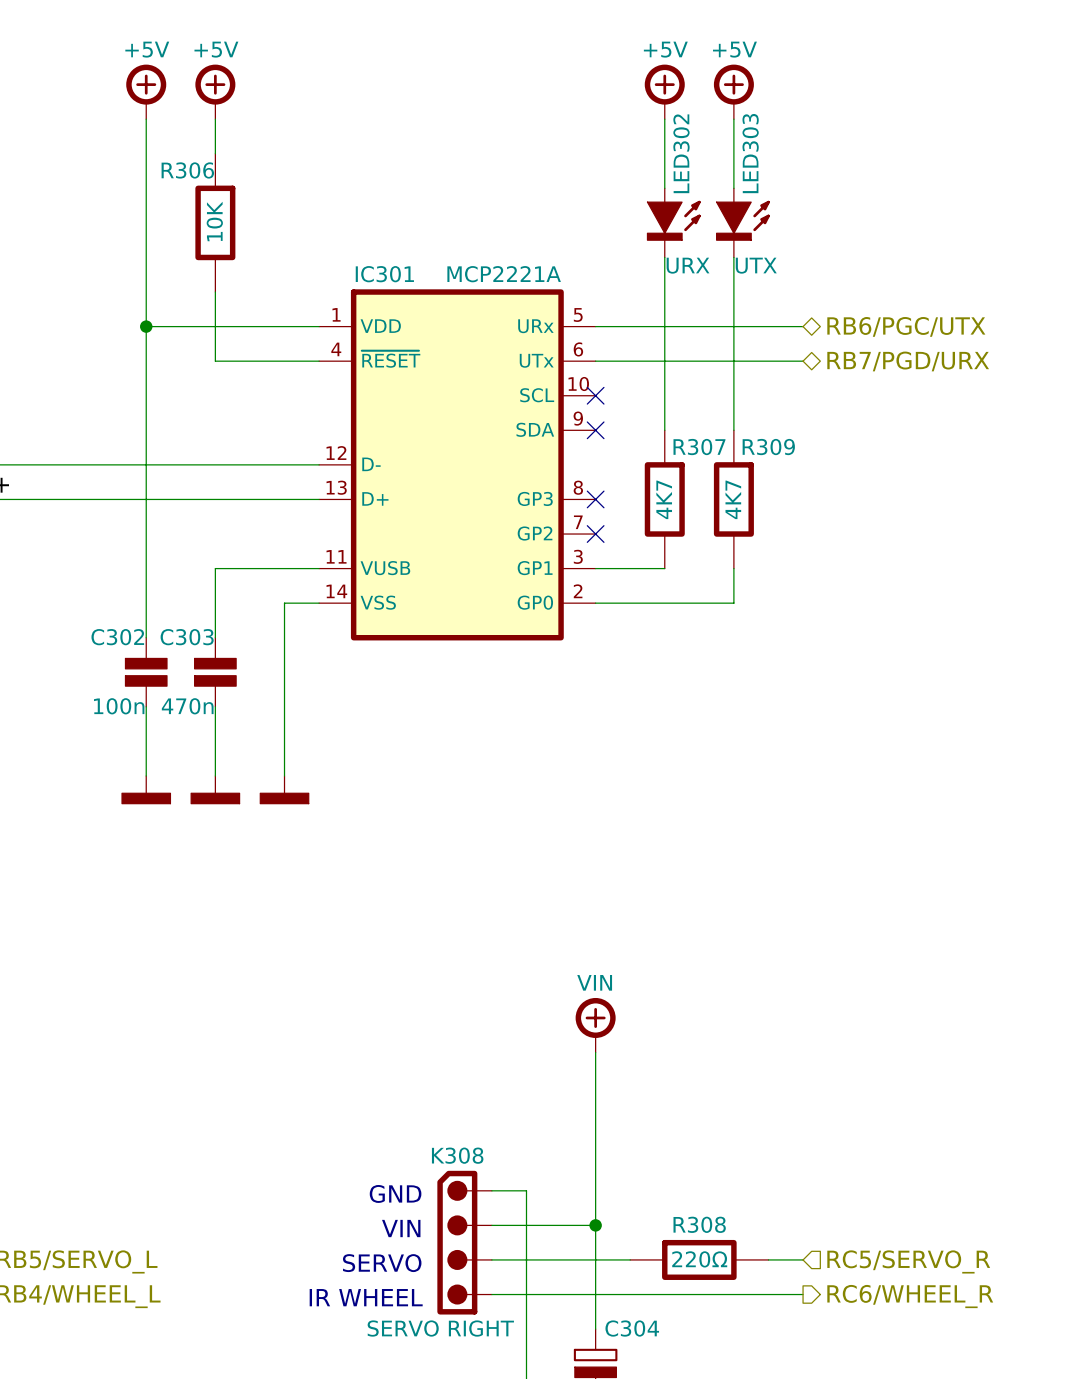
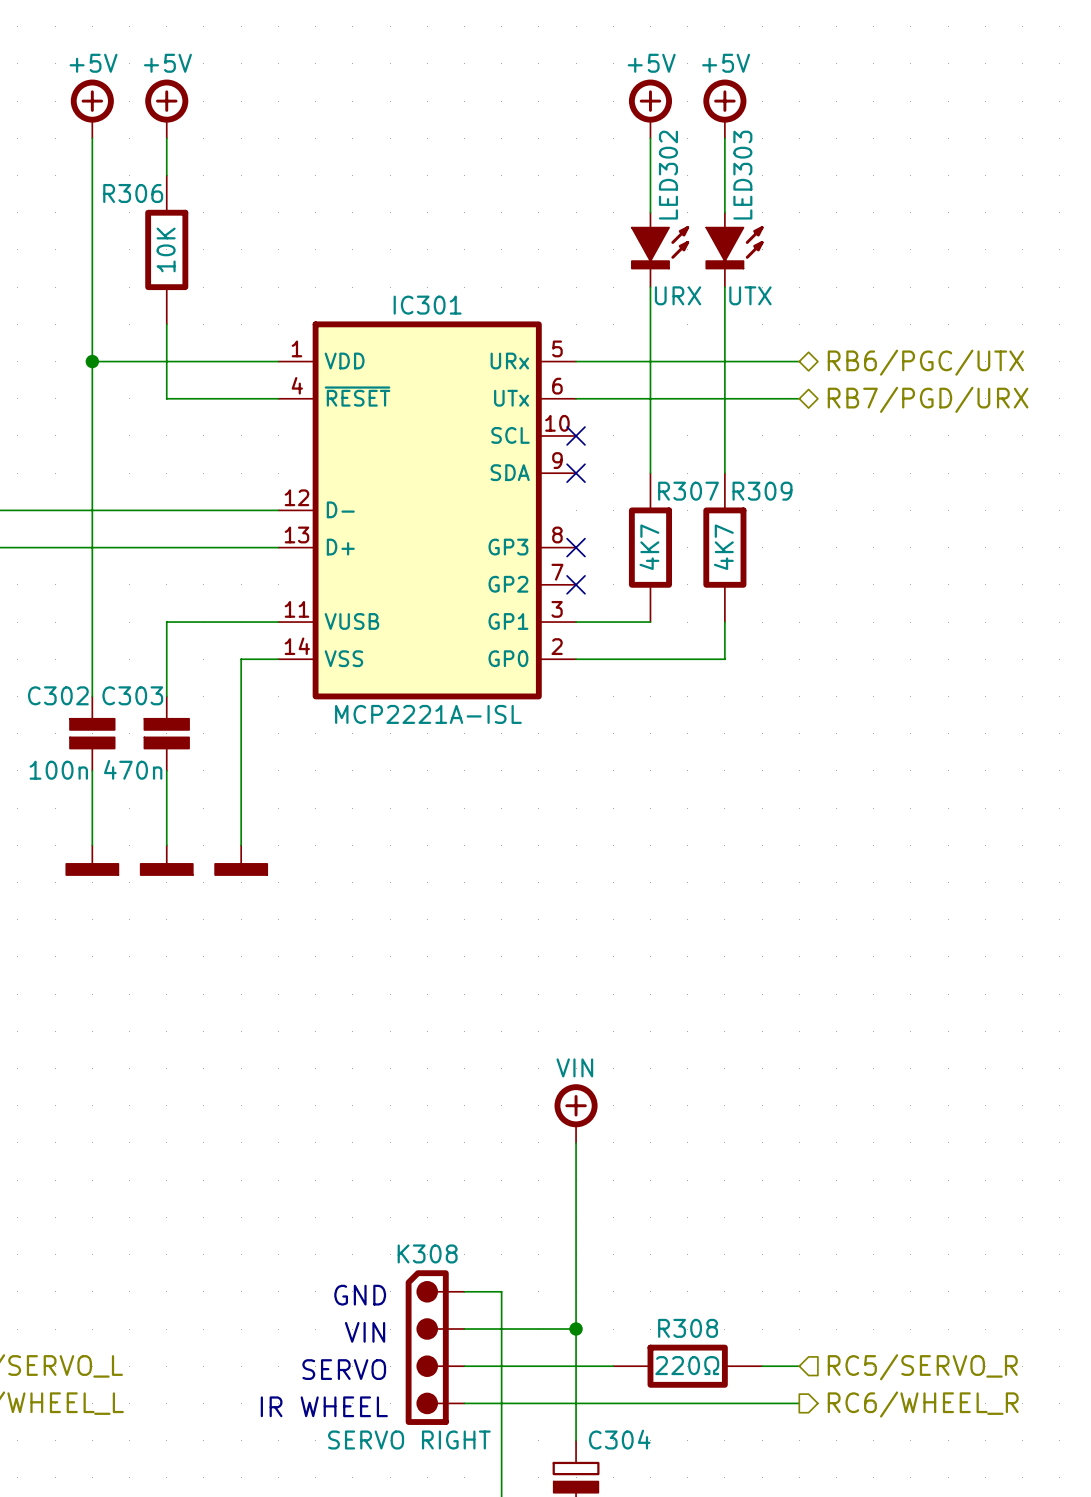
IC301 name position: IC301 (384, 274) -> IC301 (427, 305)
IC301 value: MCP2221A (504, 274) -> none
IC301 text: none -> MCP2221A-ISL (428, 714)

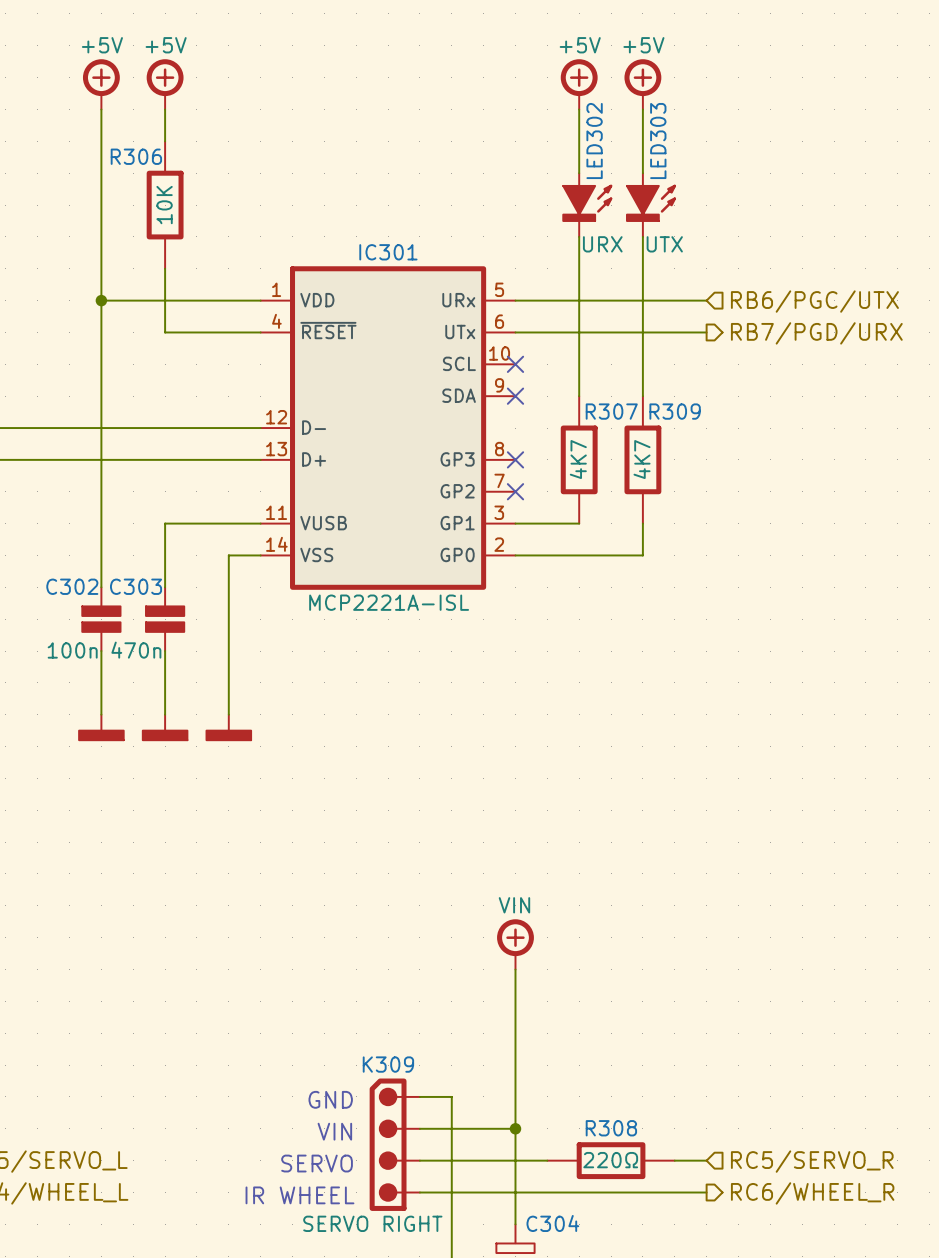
hierarchical label shape: bidirectional (925, 362) -> input (814, 301)
hierarchical label shape: bidirectional (928, 399) -> output (816, 333)
K308 name: K308 (427, 1253) -> K309 (388, 1064)

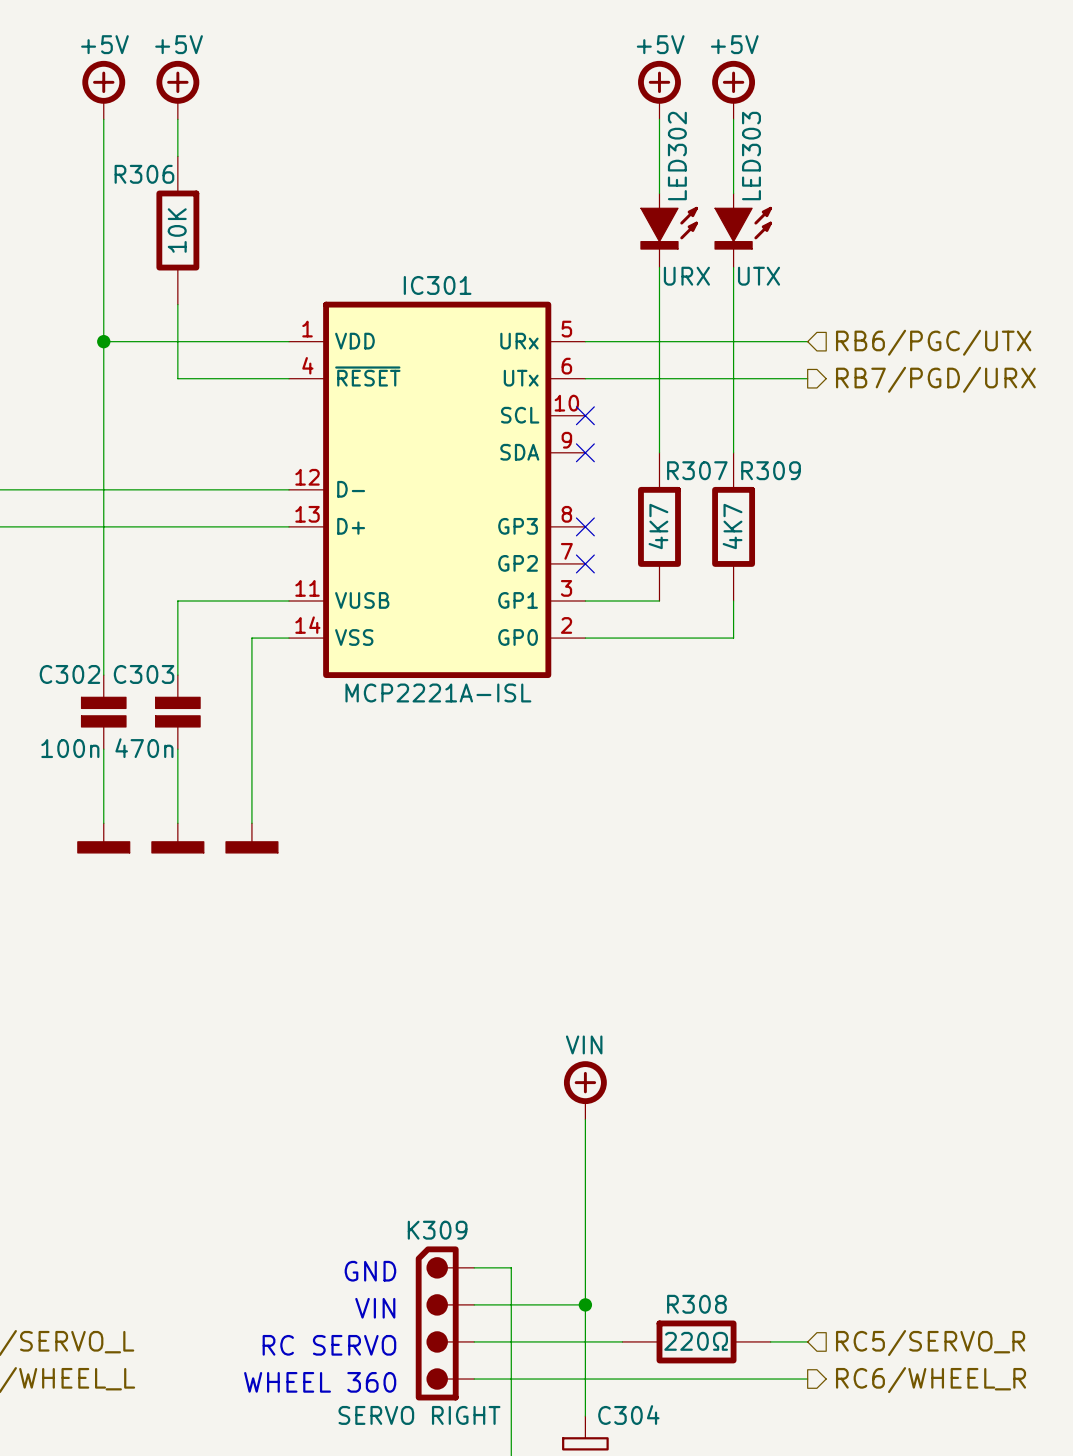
text: SERVO (317, 1163) -> RC SERVO (329, 1345)
text: IR WHEEL (299, 1195) -> WHEEL 360 (320, 1382)

